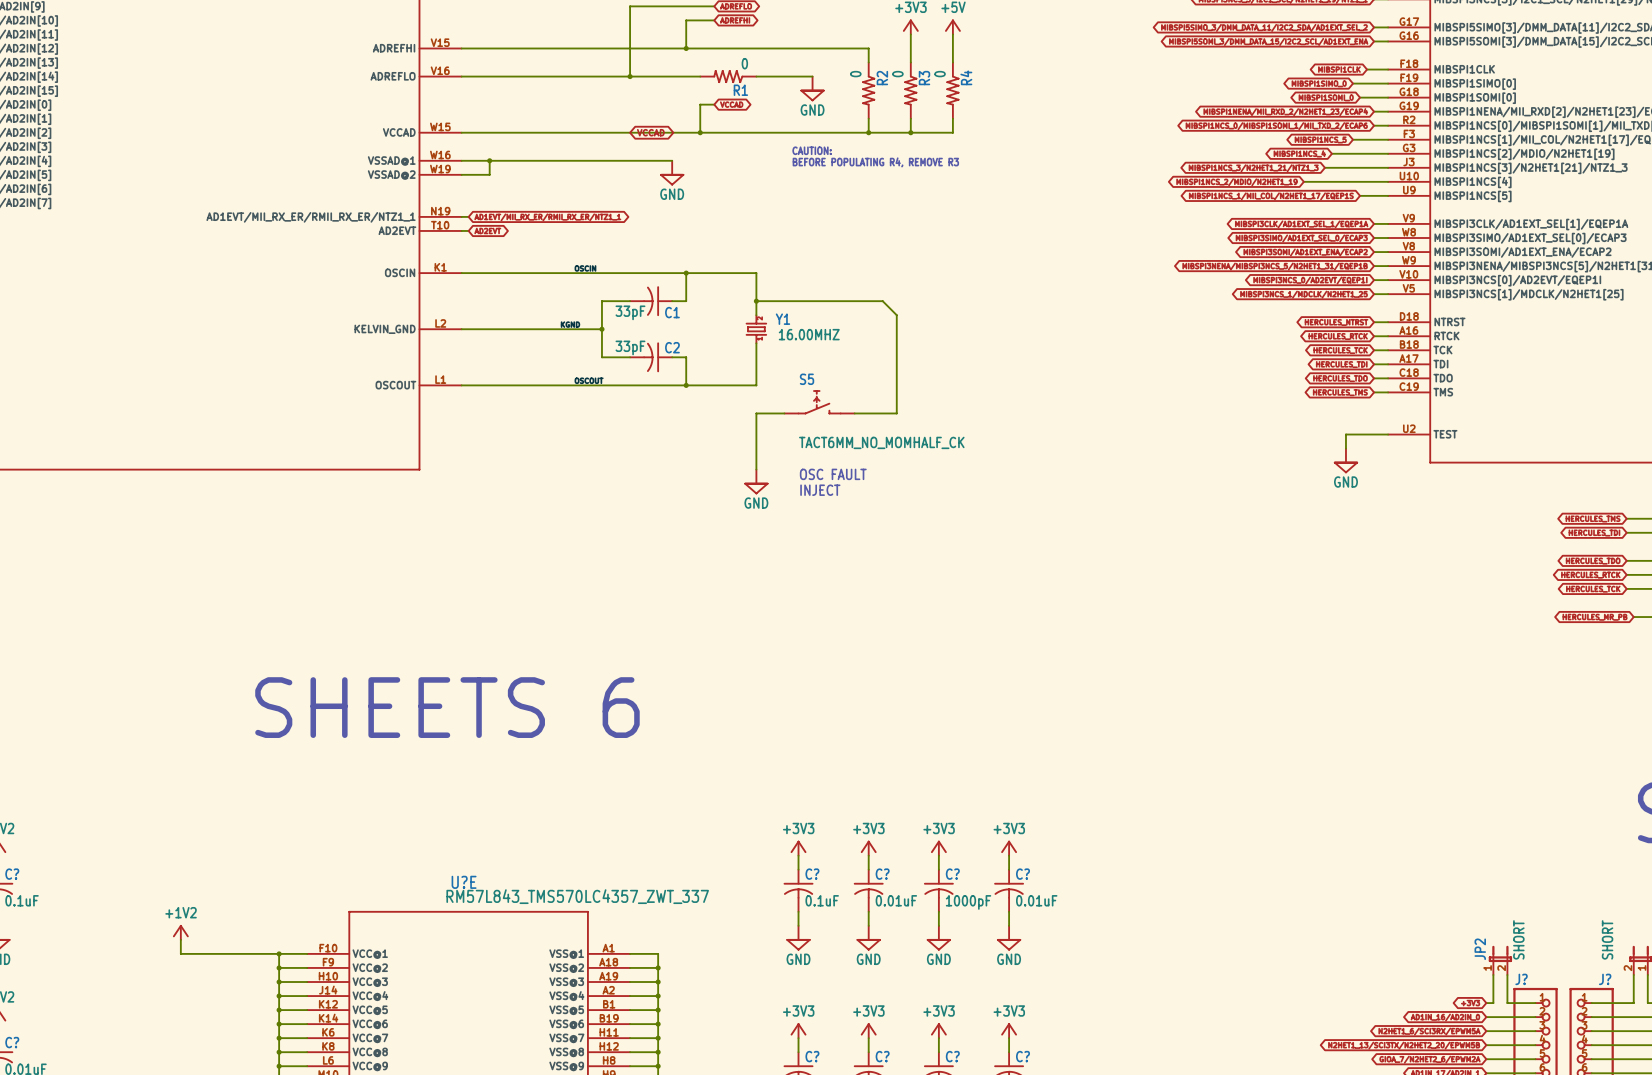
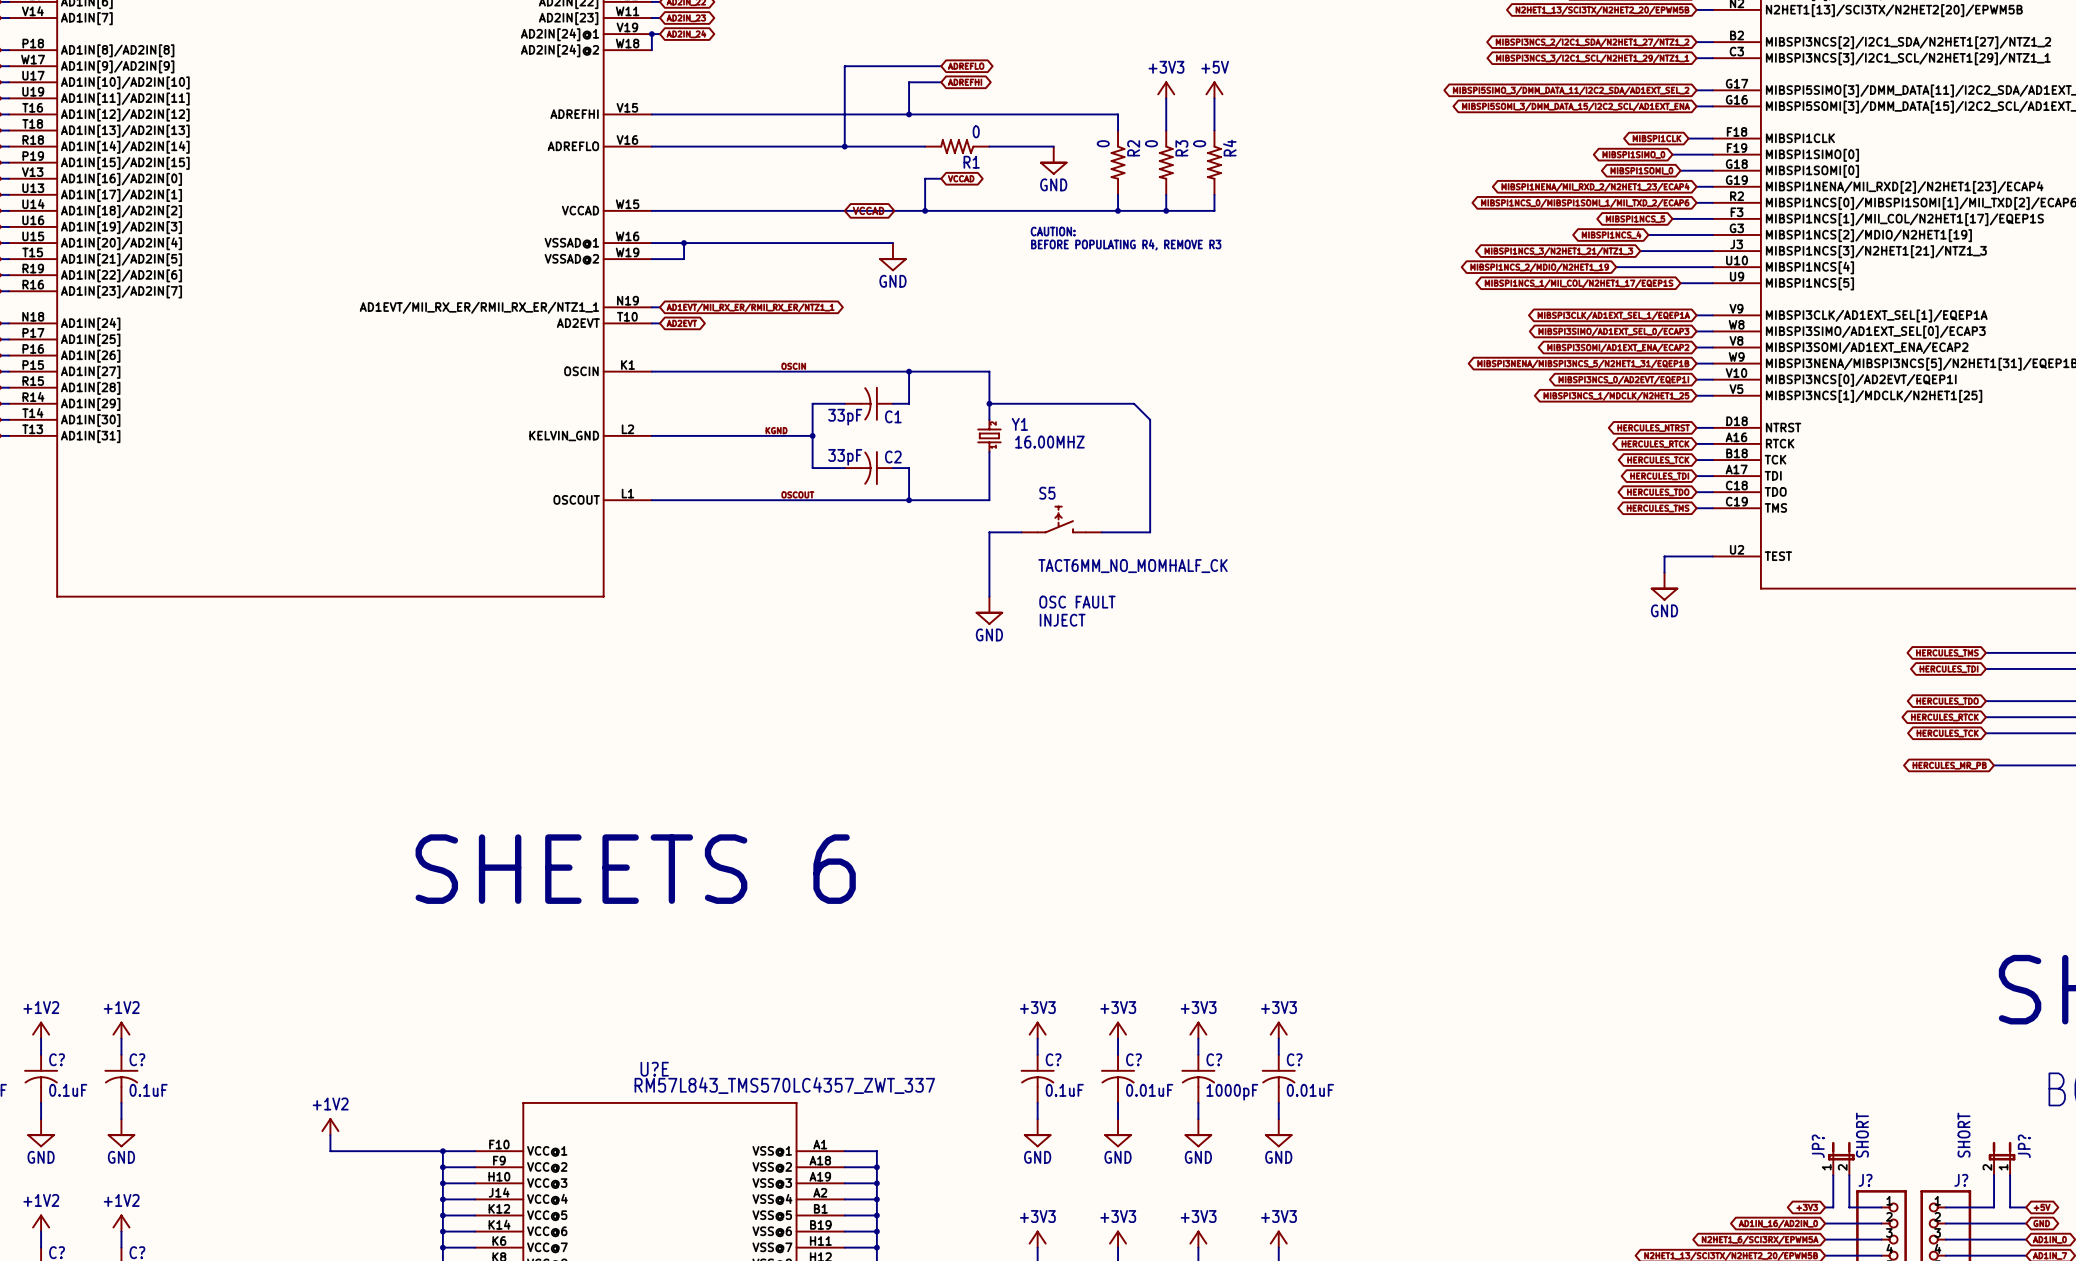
JP2 name: JP2 (1480, 949) -> JP? (1818, 1146)

